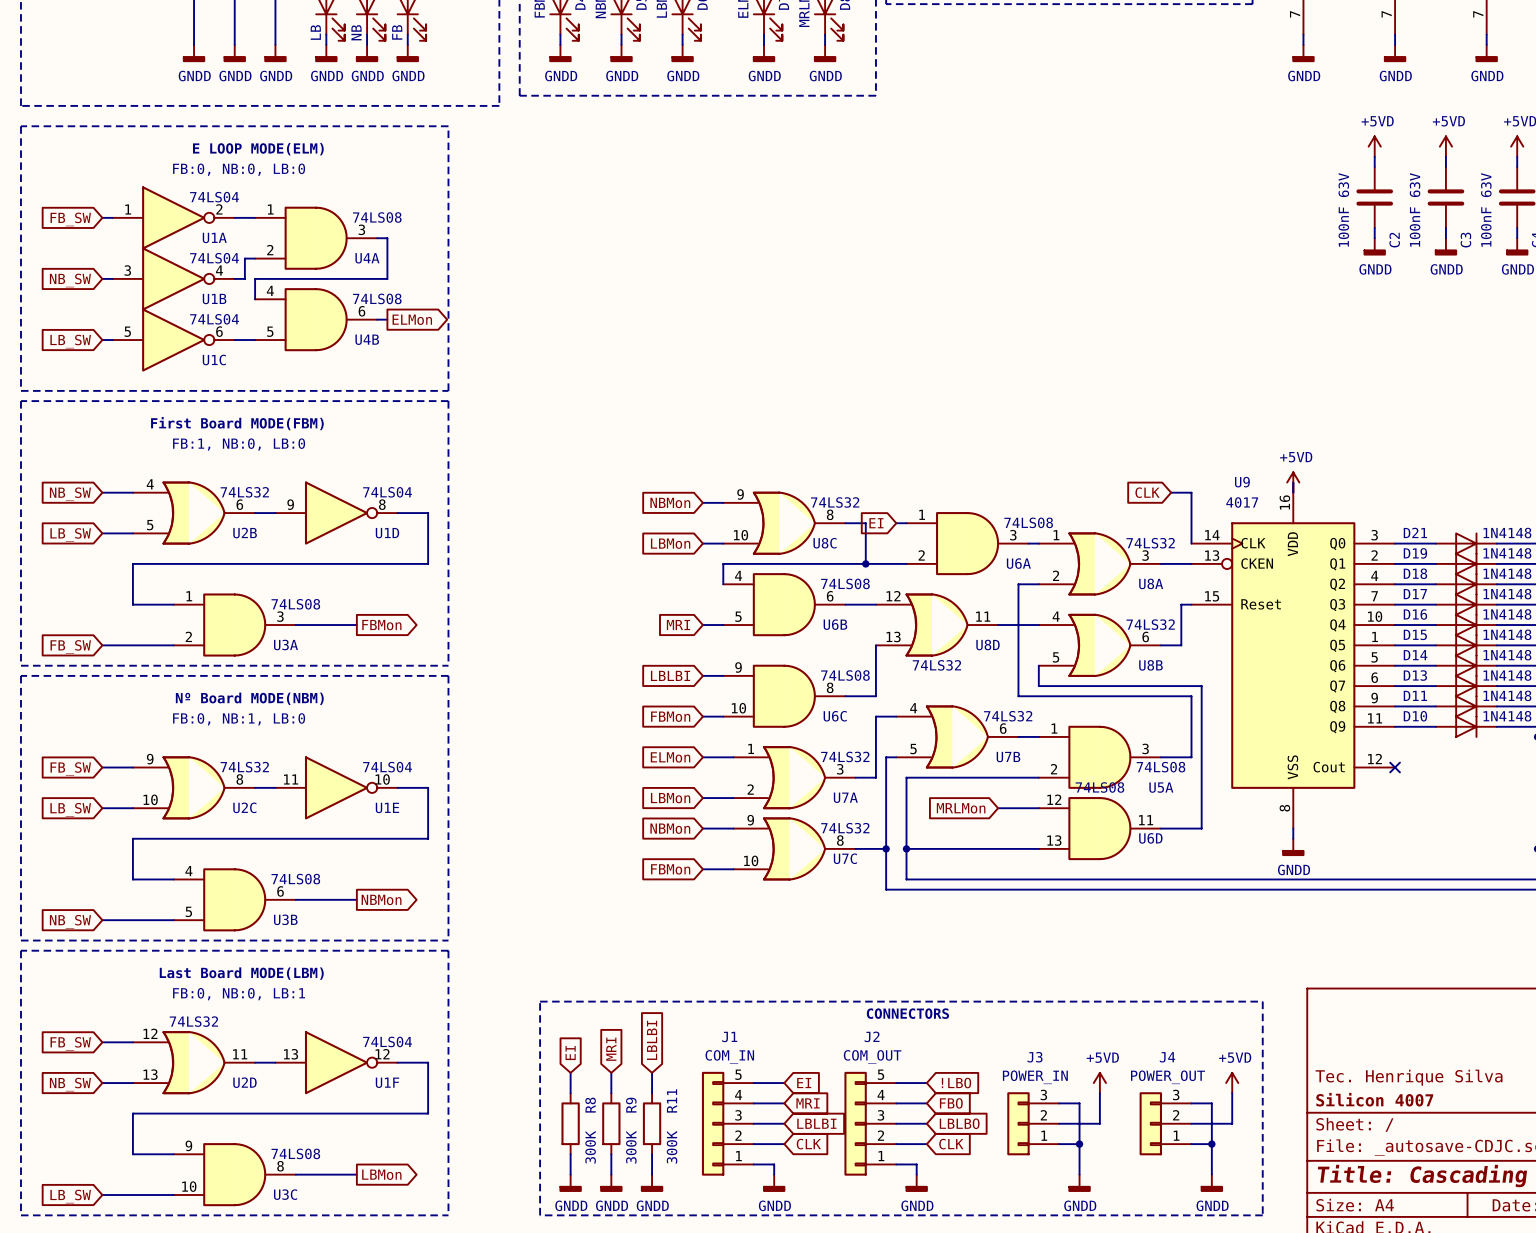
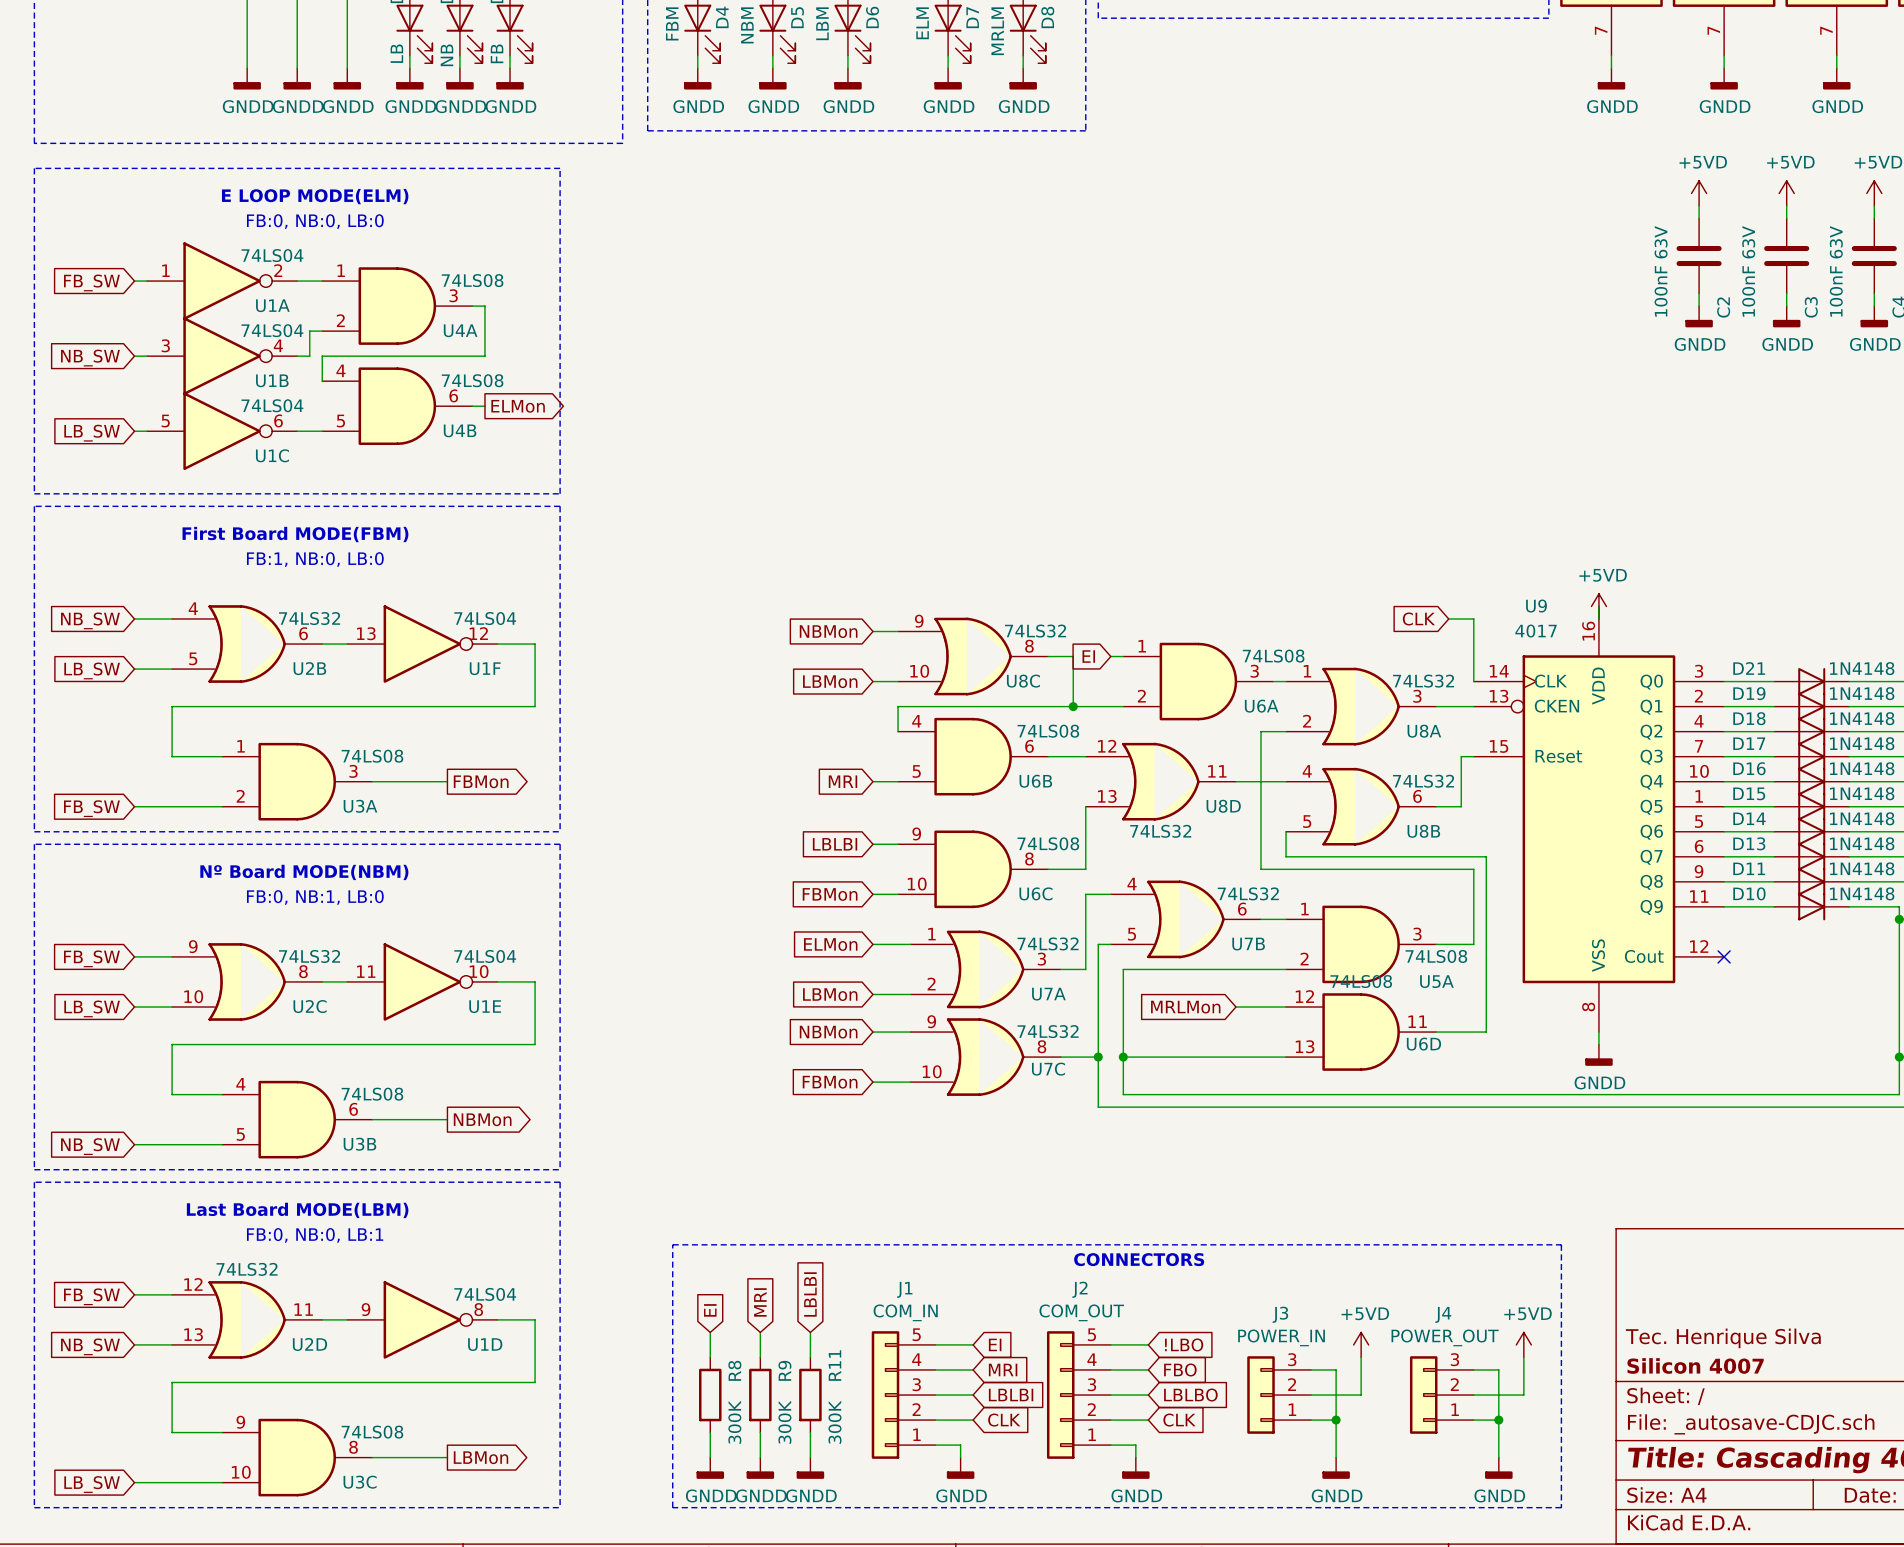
U1D position: (336, 513) -> (422, 1319)
U1F position: (336, 1062) -> (422, 644)

